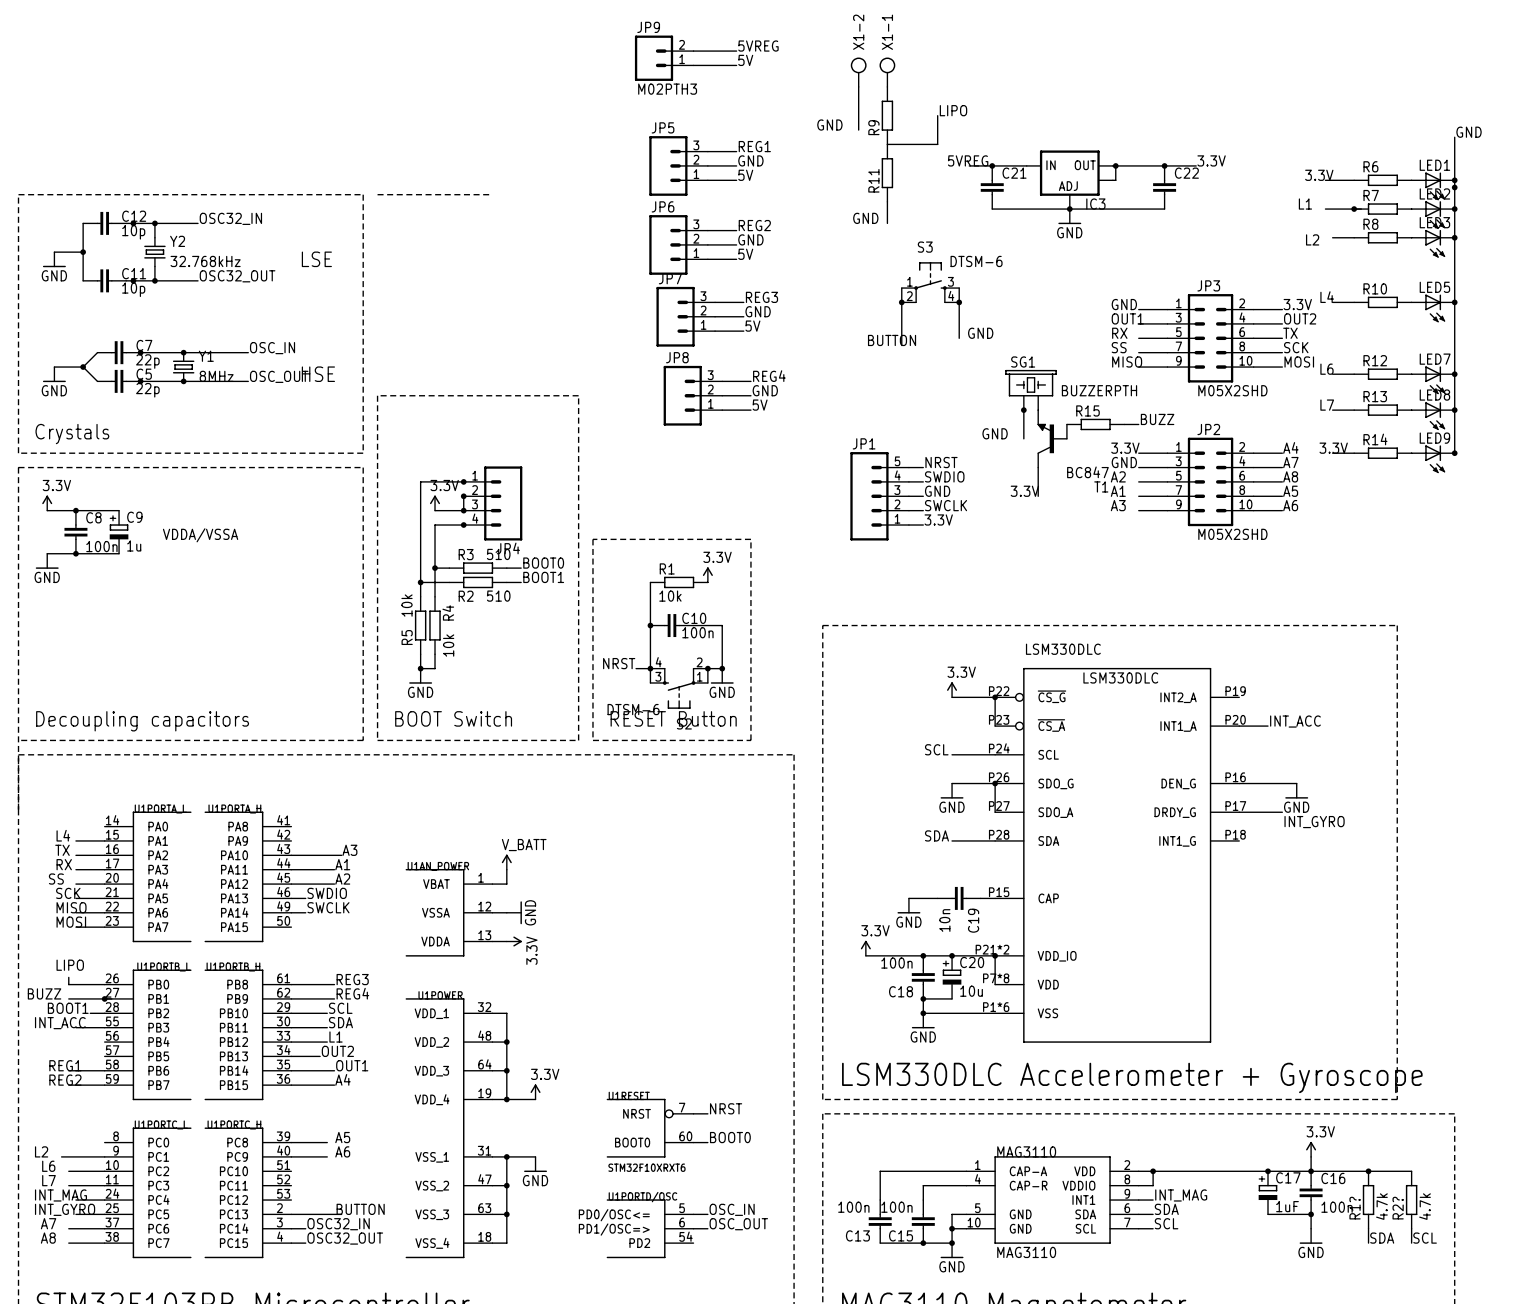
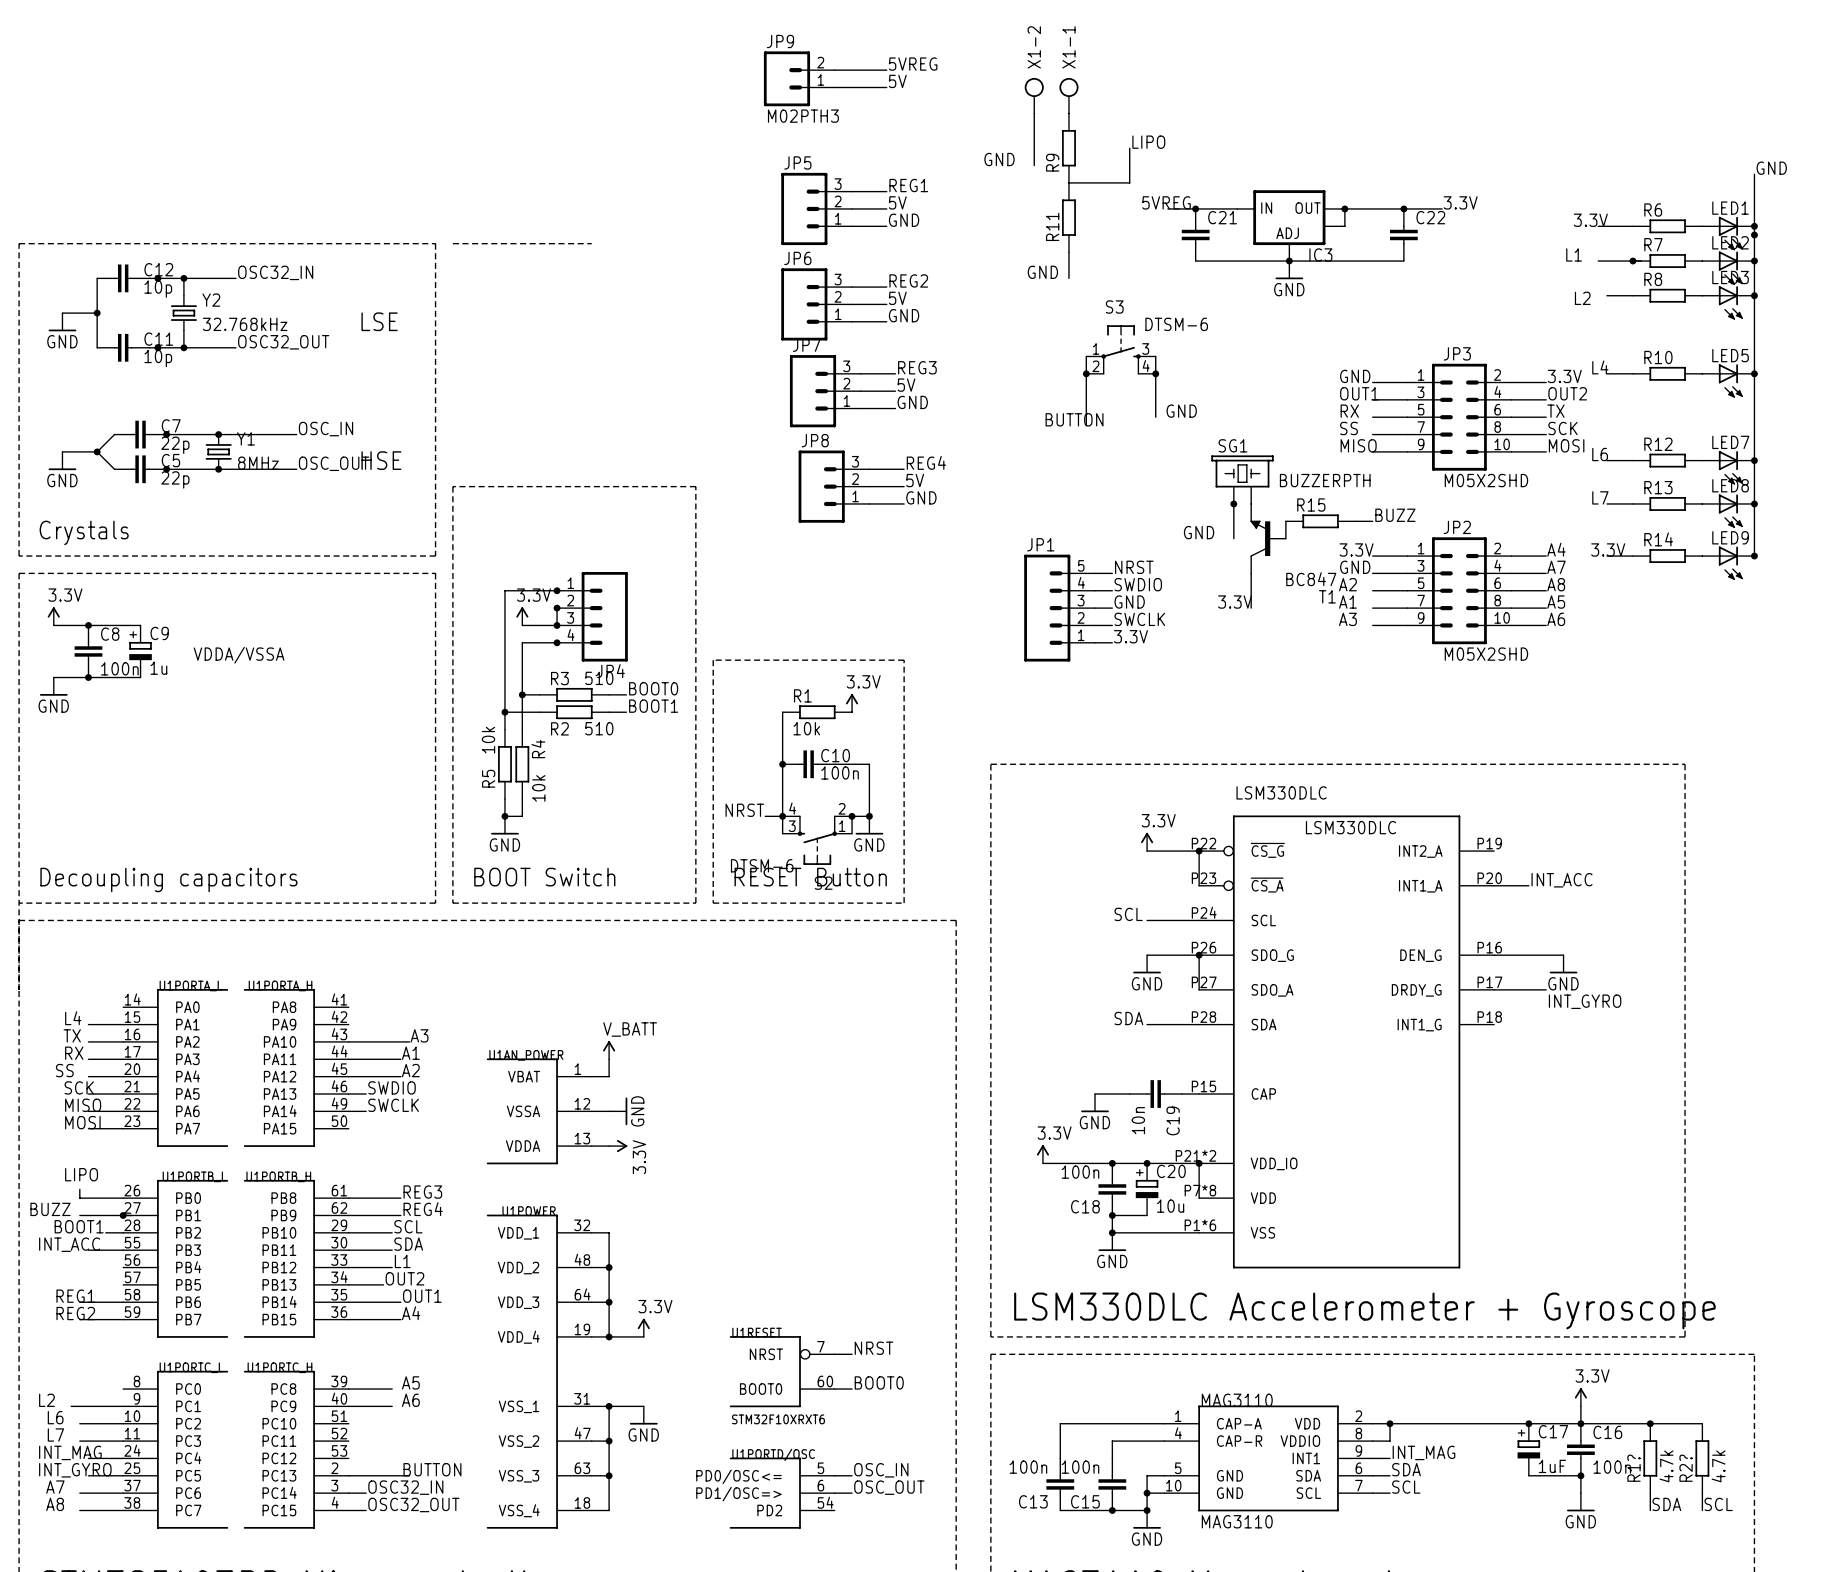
label: GND (750, 160) -> 5V (897, 202)
label: 5V (745, 175) -> GND (904, 220)
label: GND (750, 239) -> 5V (897, 298)
label: 5V (745, 254) -> GND (904, 315)
label: GND (758, 311) -> 5V (906, 385)
label: 5V (752, 326) -> GND (912, 402)
label: GND (765, 390) -> 5V (915, 480)
label: 5V (760, 405) -> GND (921, 497)

